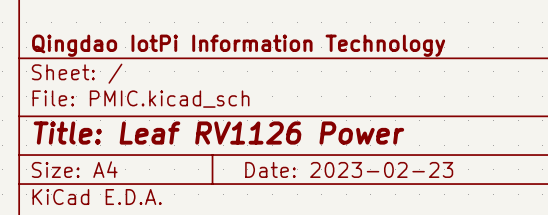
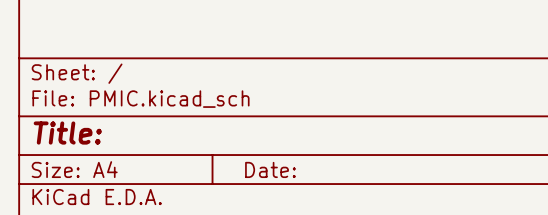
title block: Qingdao IotPi Information Technology (238, 45) -> none
title block: Title: Leaf RV1126 Power (218, 133) -> Title: (67, 133)
title block: Date: 2023-02-23 (349, 169) -> Date: (270, 169)

